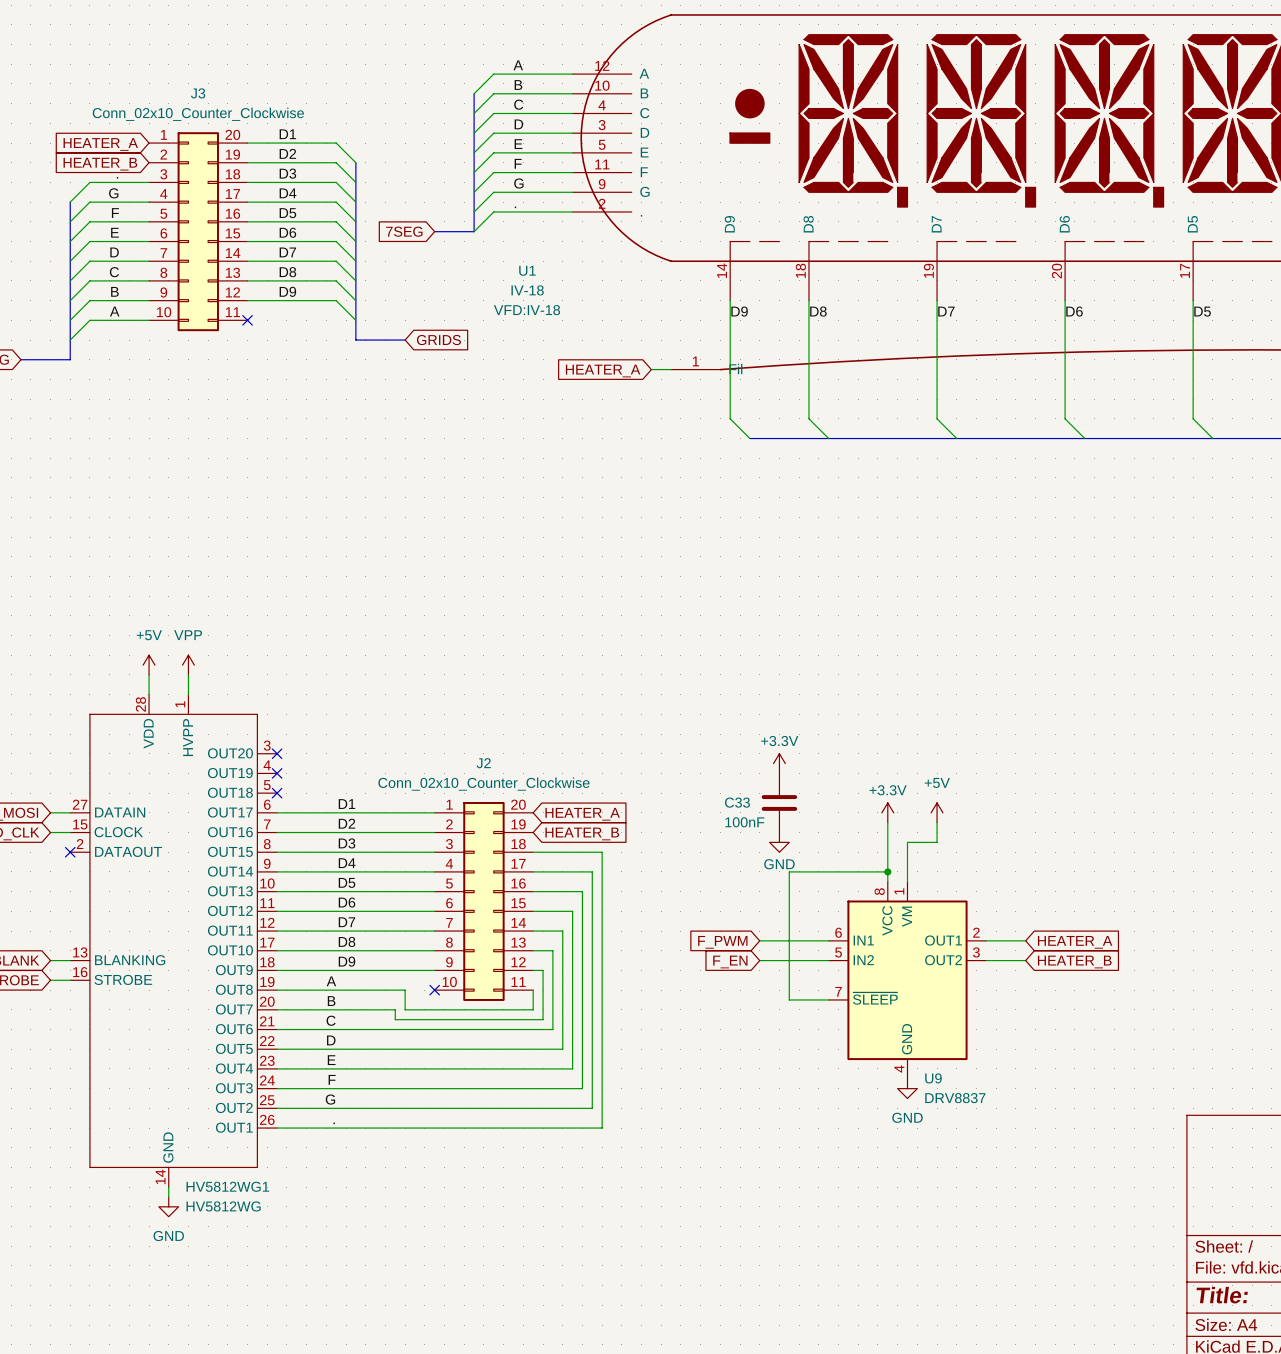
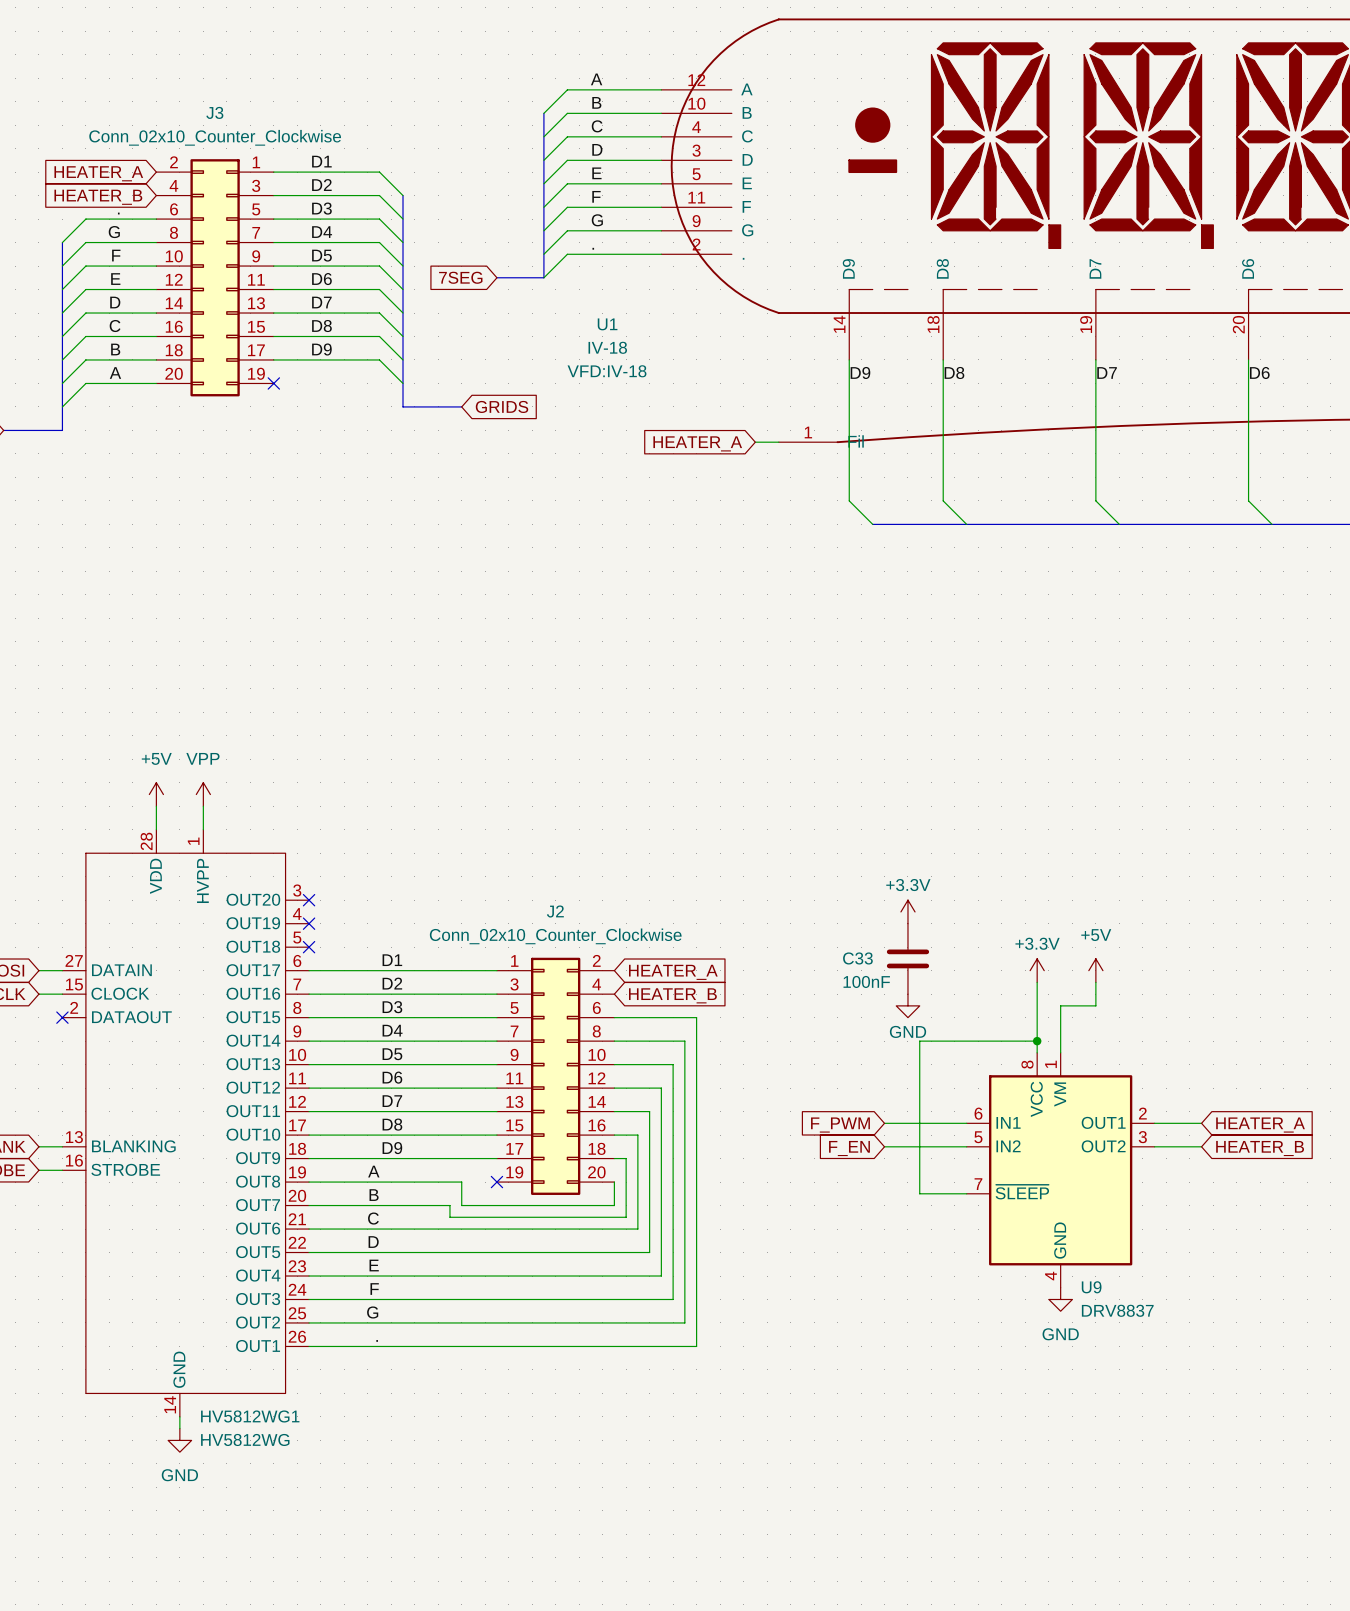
J3 symbol: [149, 132, 248, 332] -> [156, 159, 274, 397]
J2 symbol: [434, 802, 534, 1001] -> [496, 957, 615, 1195]

